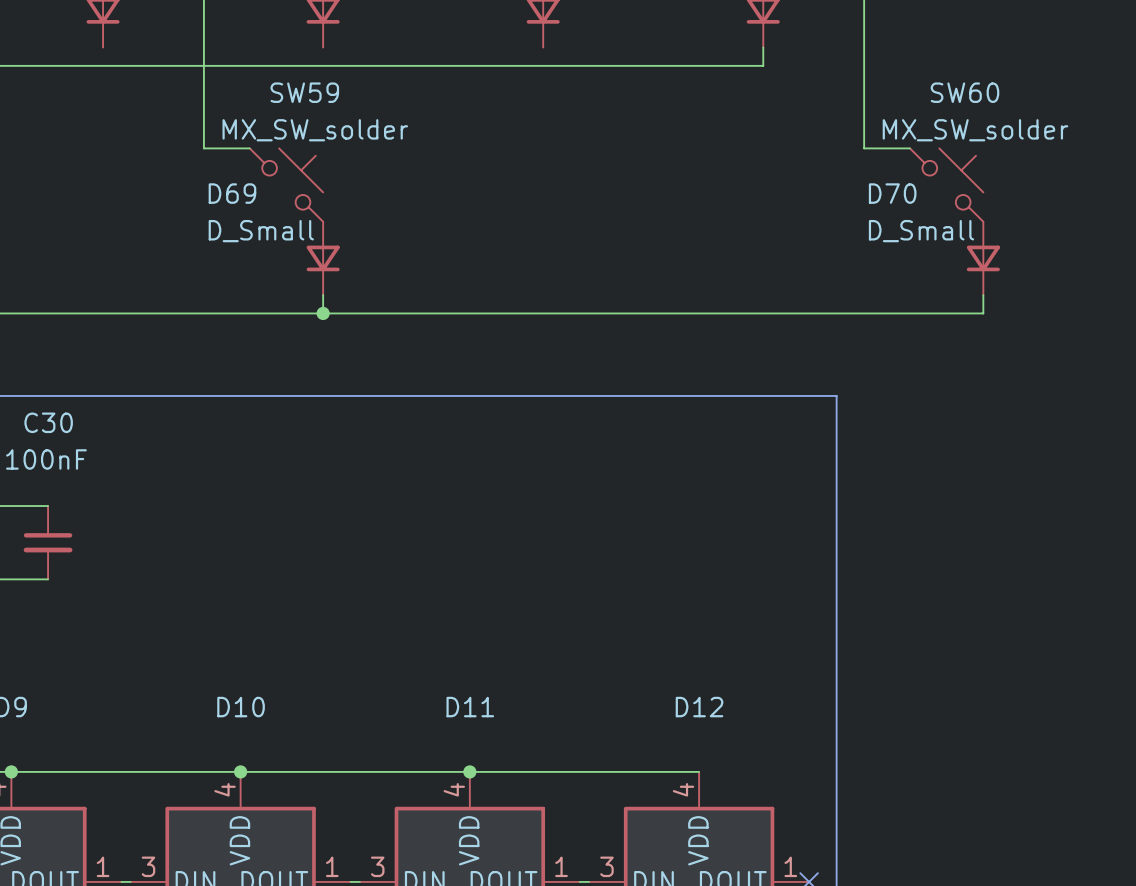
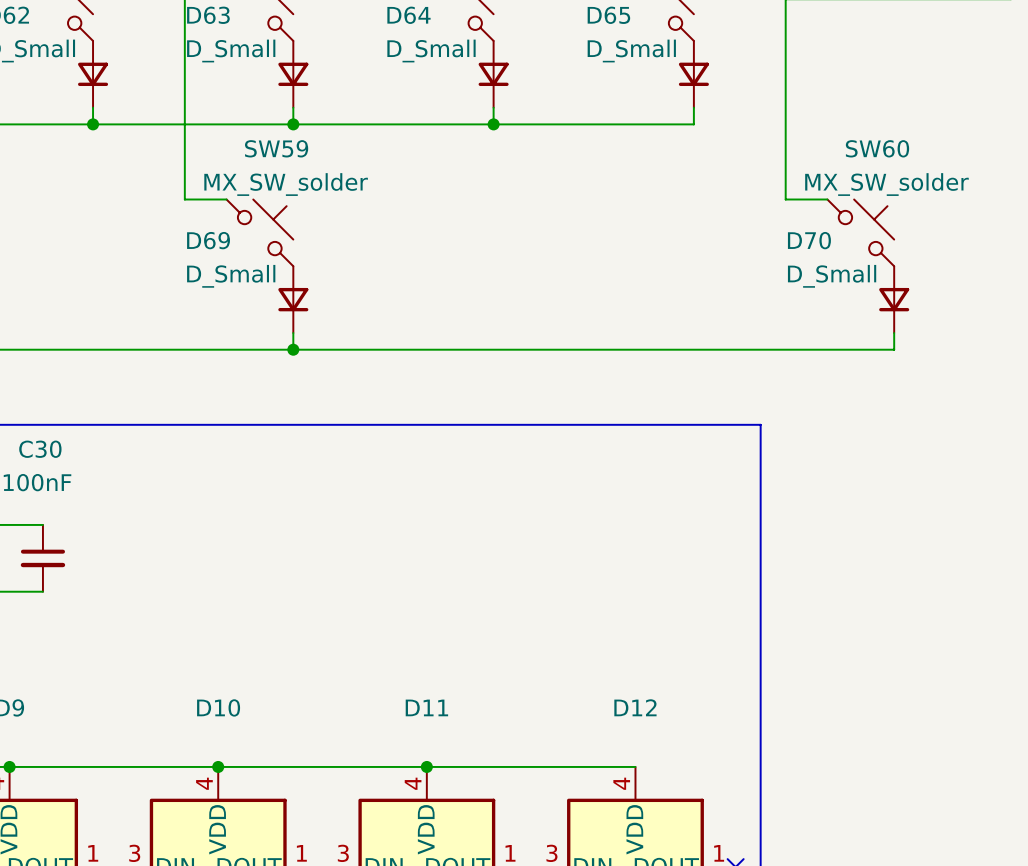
wire: none -> (93, 107) (93, 124)
wire: none -> (293, 107) (293, 124)
wire: none -> (493, 107) (493, 124)
junction: none -> (93, 124)
junction: none -> (293, 124)
junction: none -> (493, 124)

